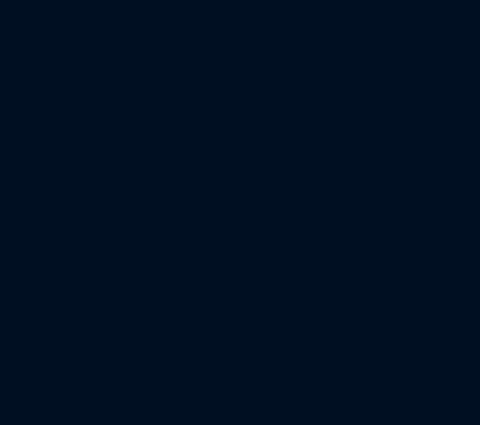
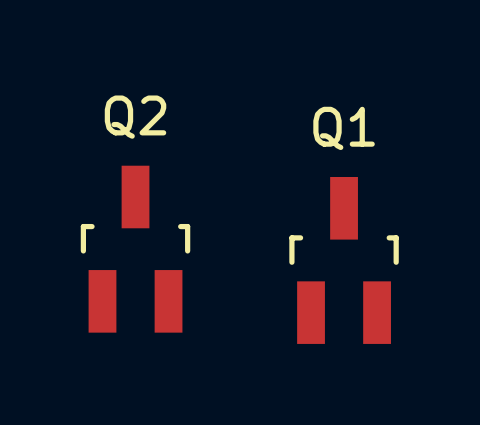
Q2: none -> (135, 249)
Q1: none -> (344, 260)

